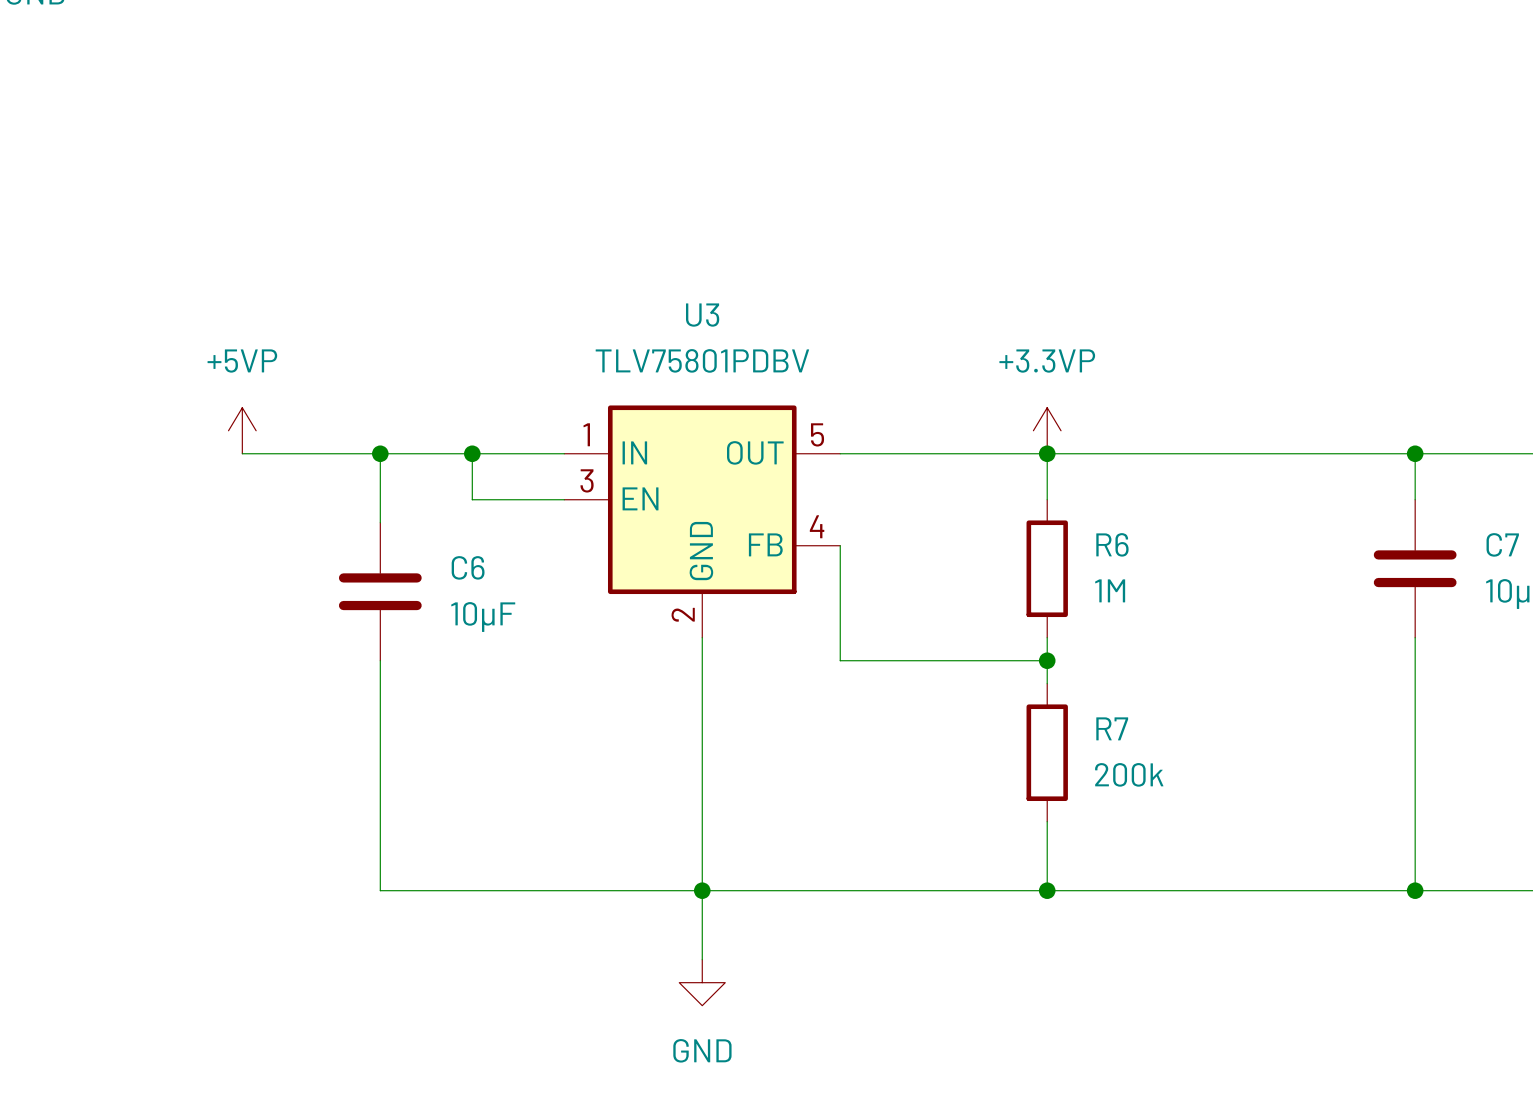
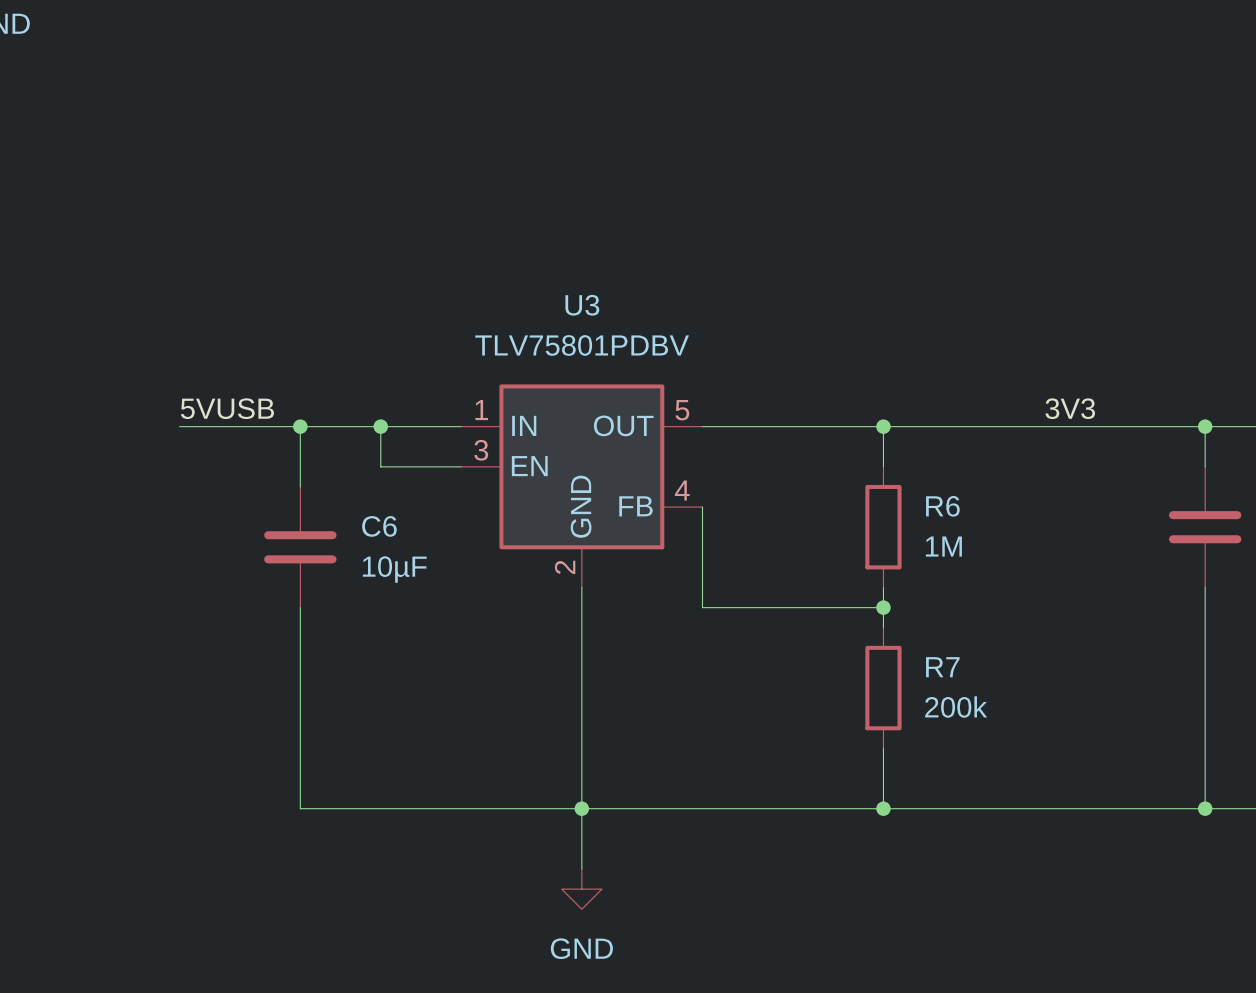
power symbol: +5VP (242, 430) -> none
power symbol: +3.3VP (1047, 430) -> none
label: none -> 5VUSB (227, 408)
label: none -> 3V3 (1070, 408)

